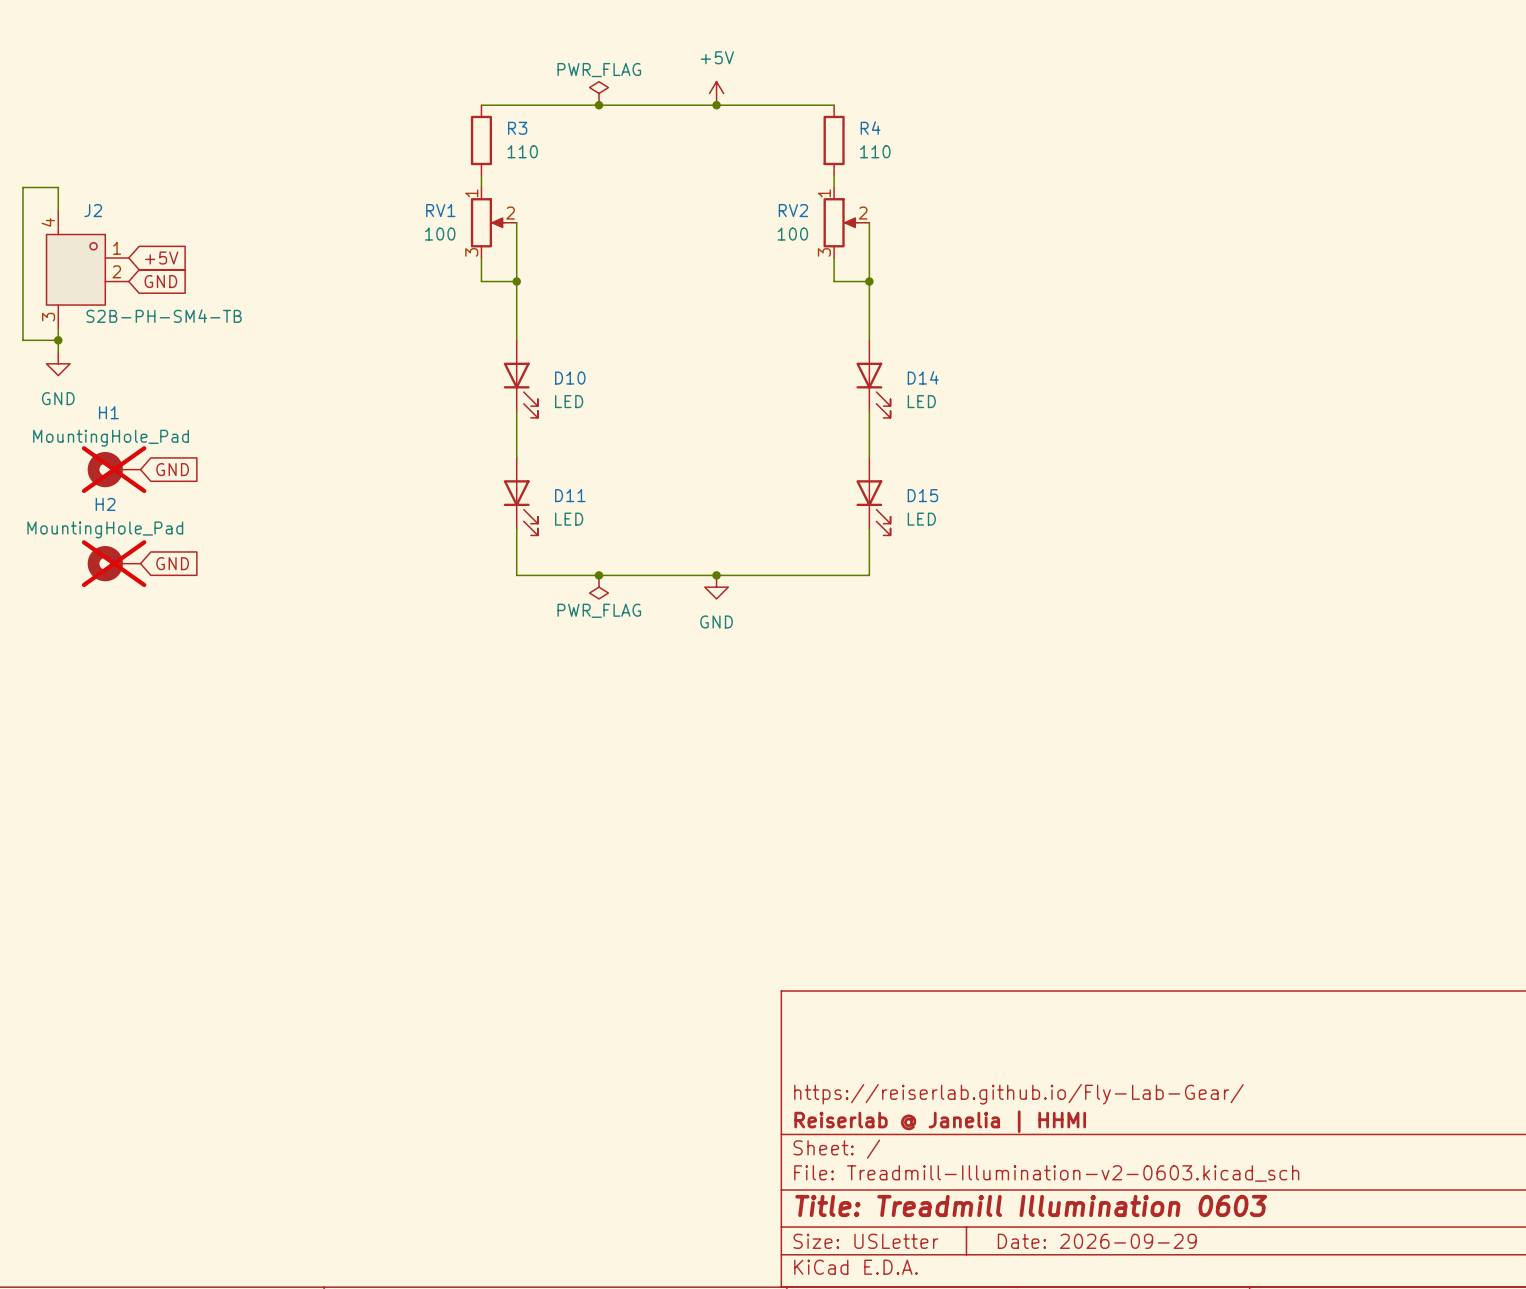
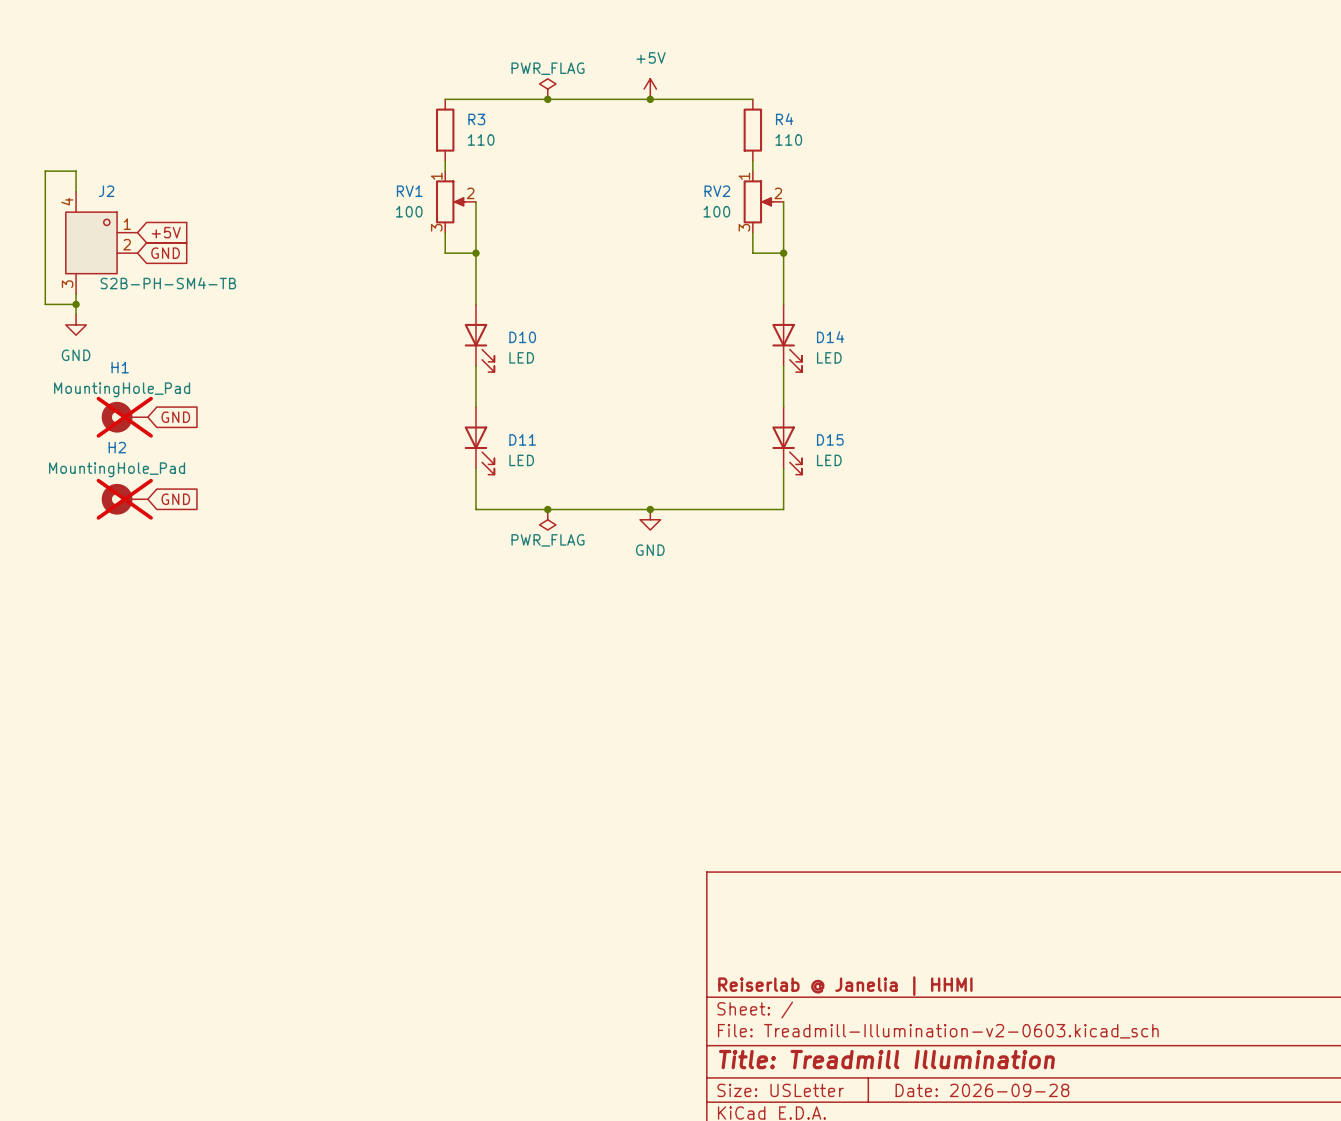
title block: https://reiserlab.github.io/Fly-Lab-Gear/ (1018, 1094) -> none
title block: Title: Treadmill Illumination 0603 (1031, 1205) -> Title: Treadmill Illumination (886, 1059)
title block: Date: 2026-09-29 (1097, 1241) -> Date: 2026-09-28 (982, 1090)

